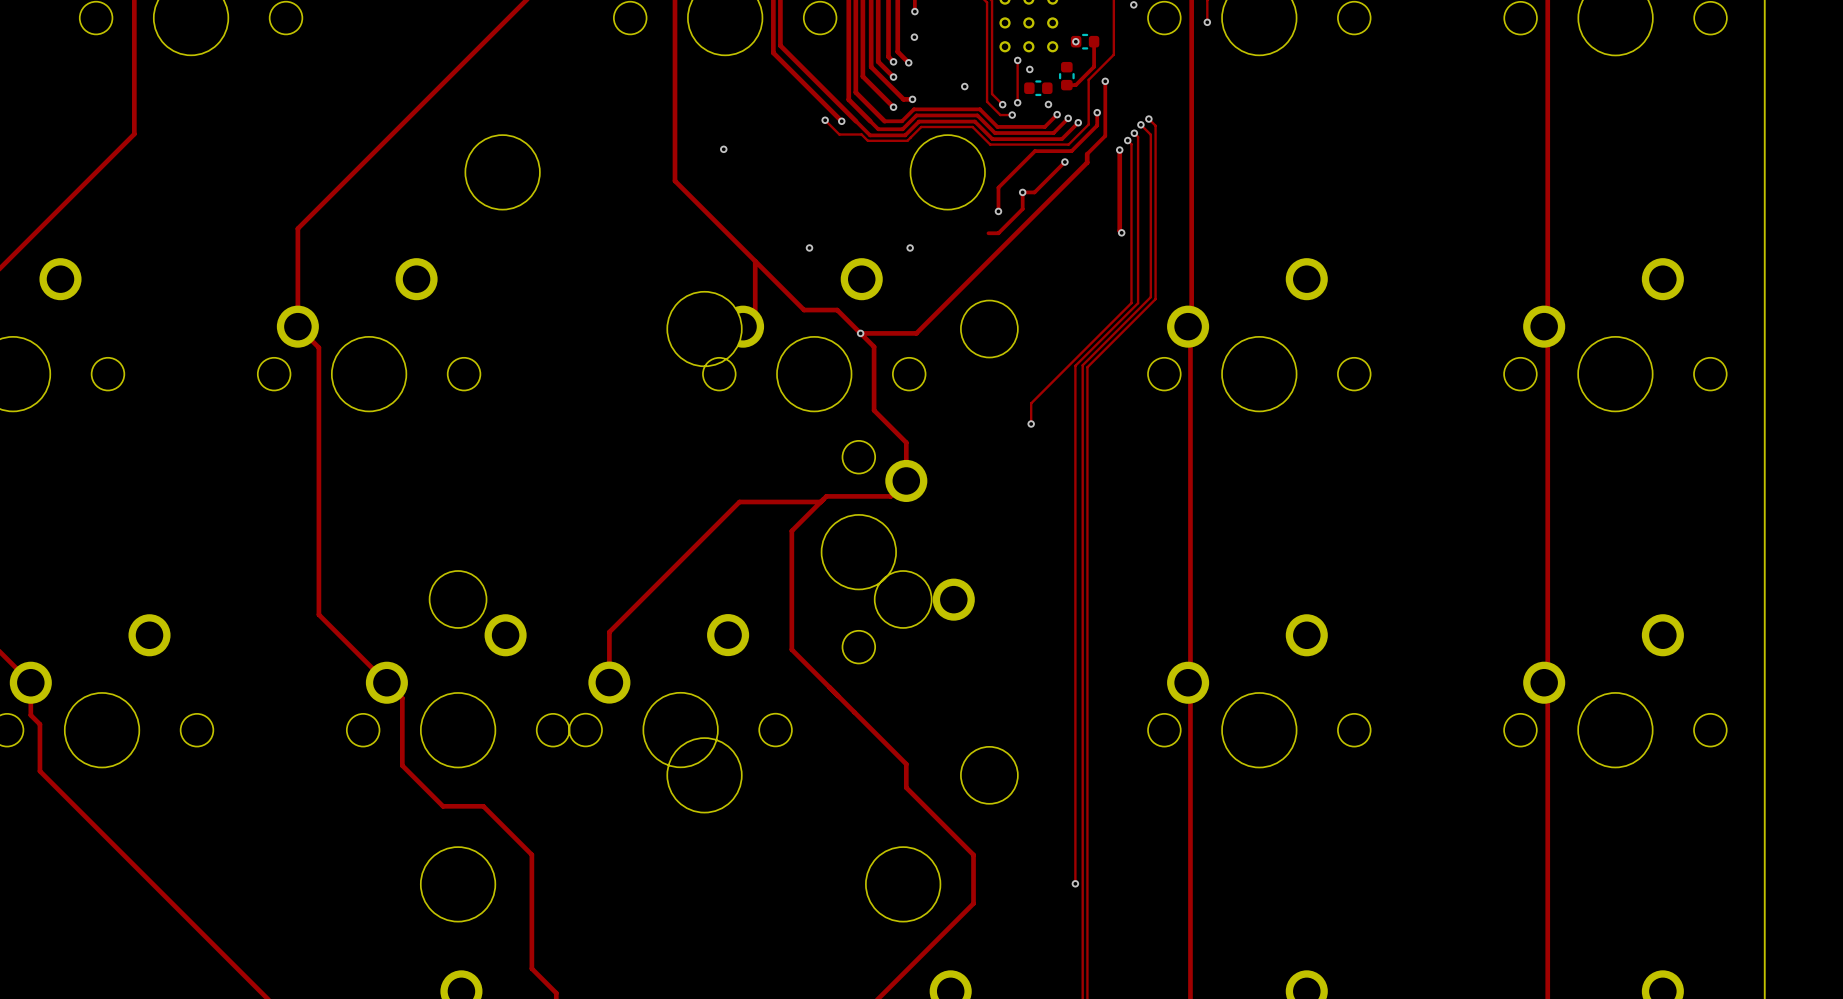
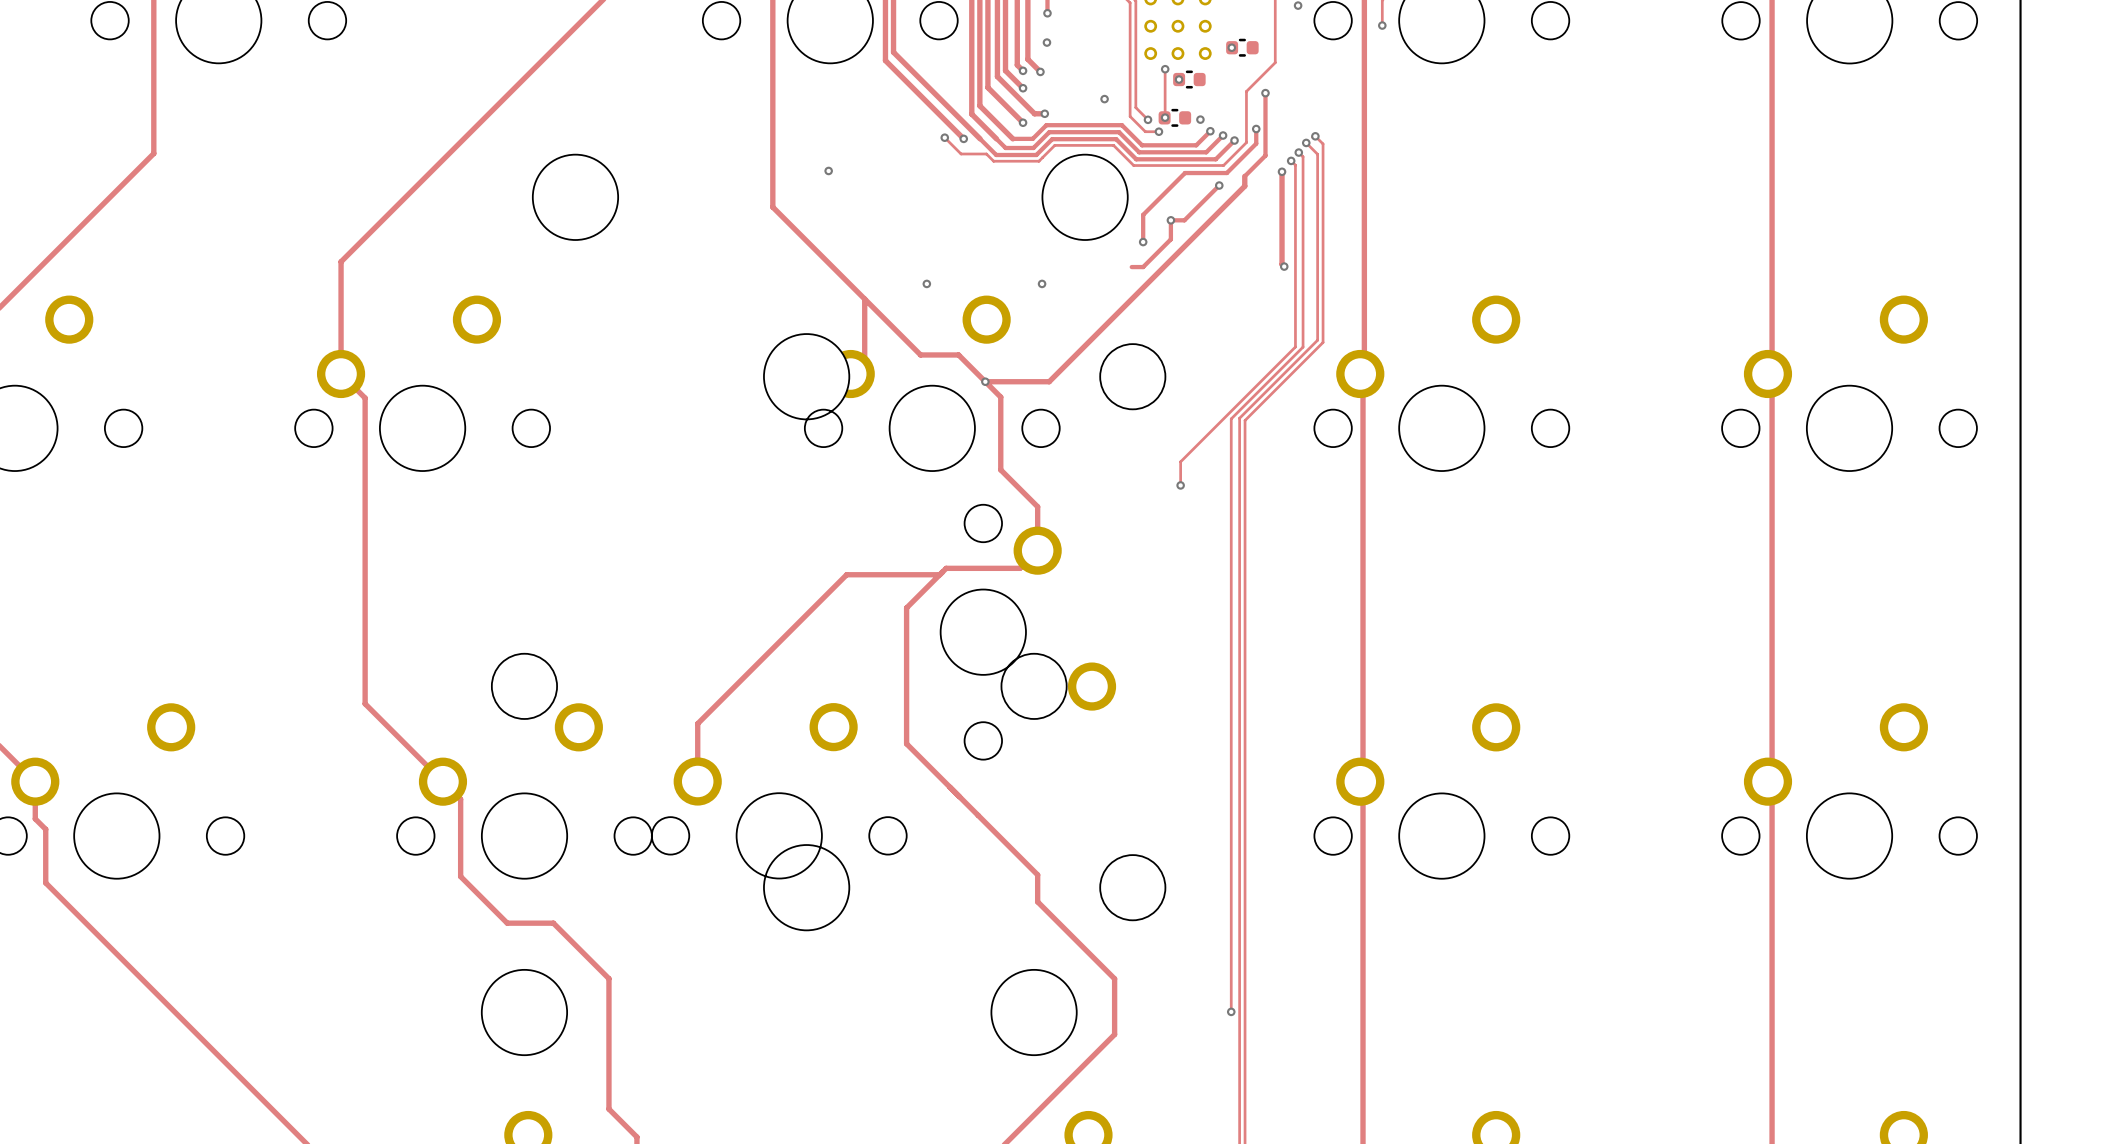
track: (1094, 41) (1094, 66) (1075, 85) (1066, 85) -> none
part: none -> (1189, 79)
part: (1066, 76) -> none
part: (1038, 88) -> none
part: none -> (1174, 117)

